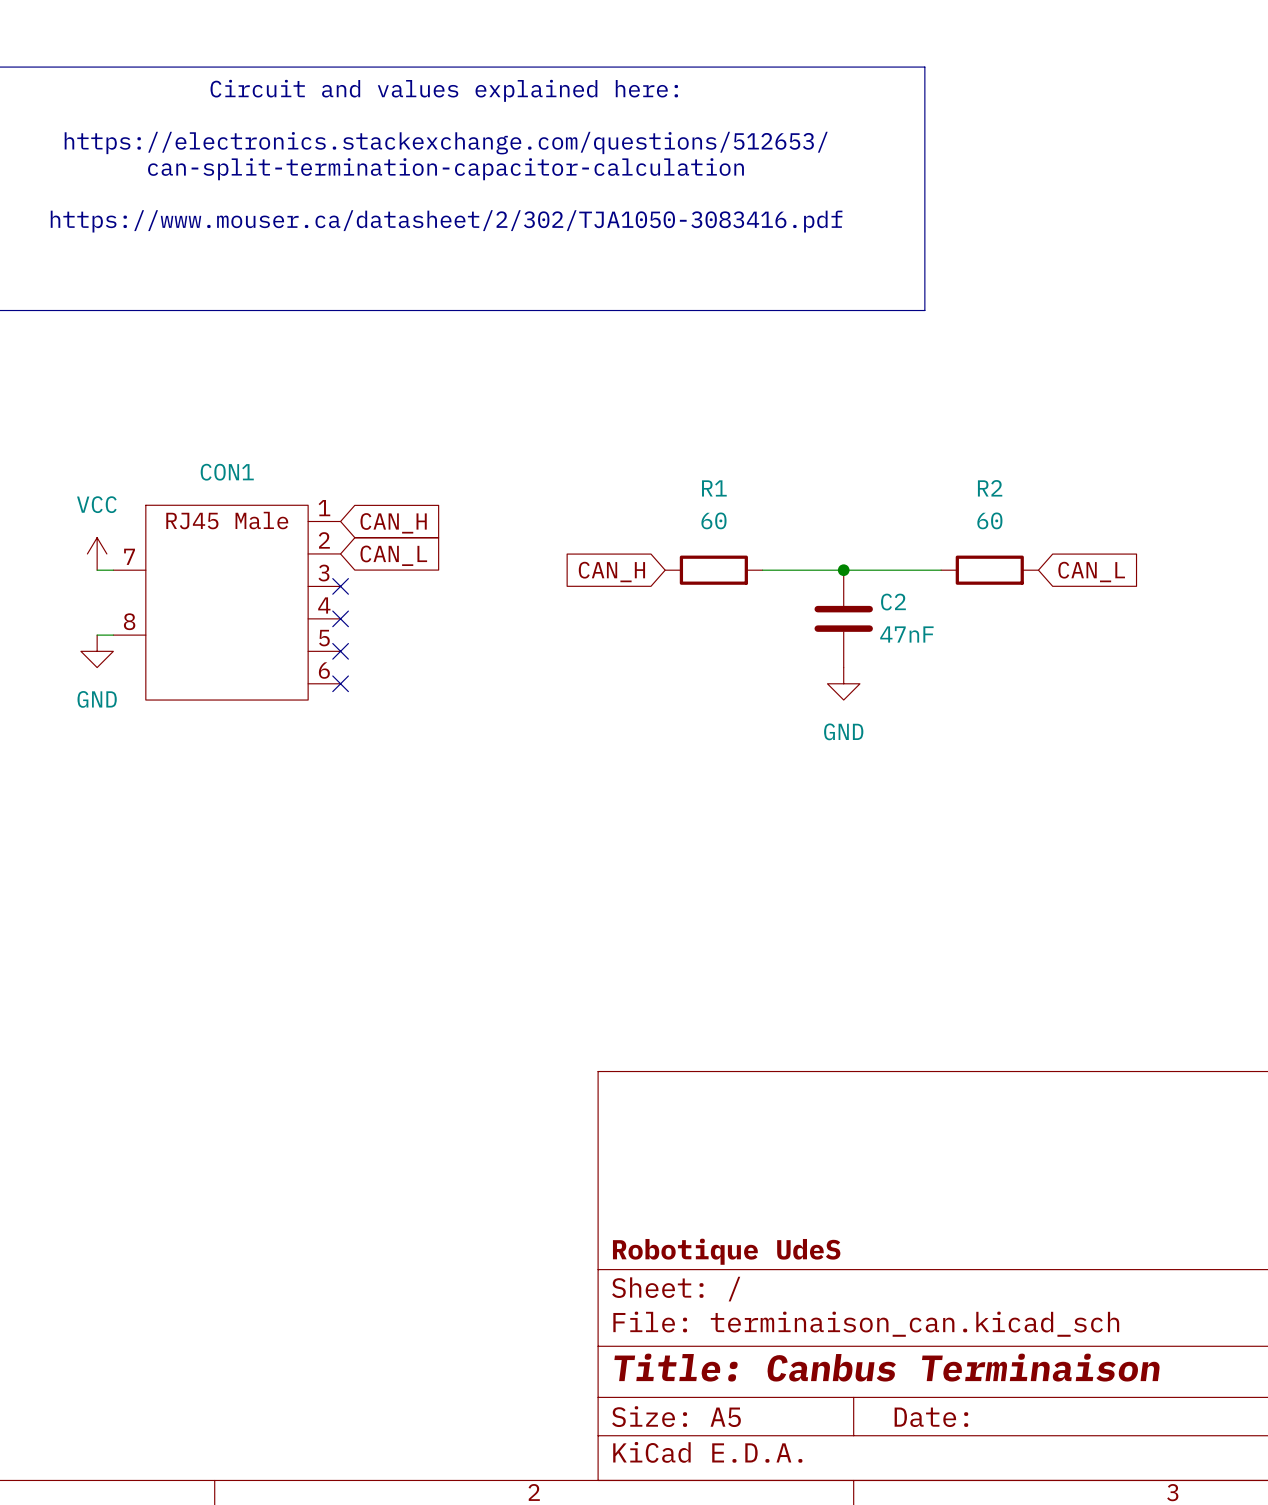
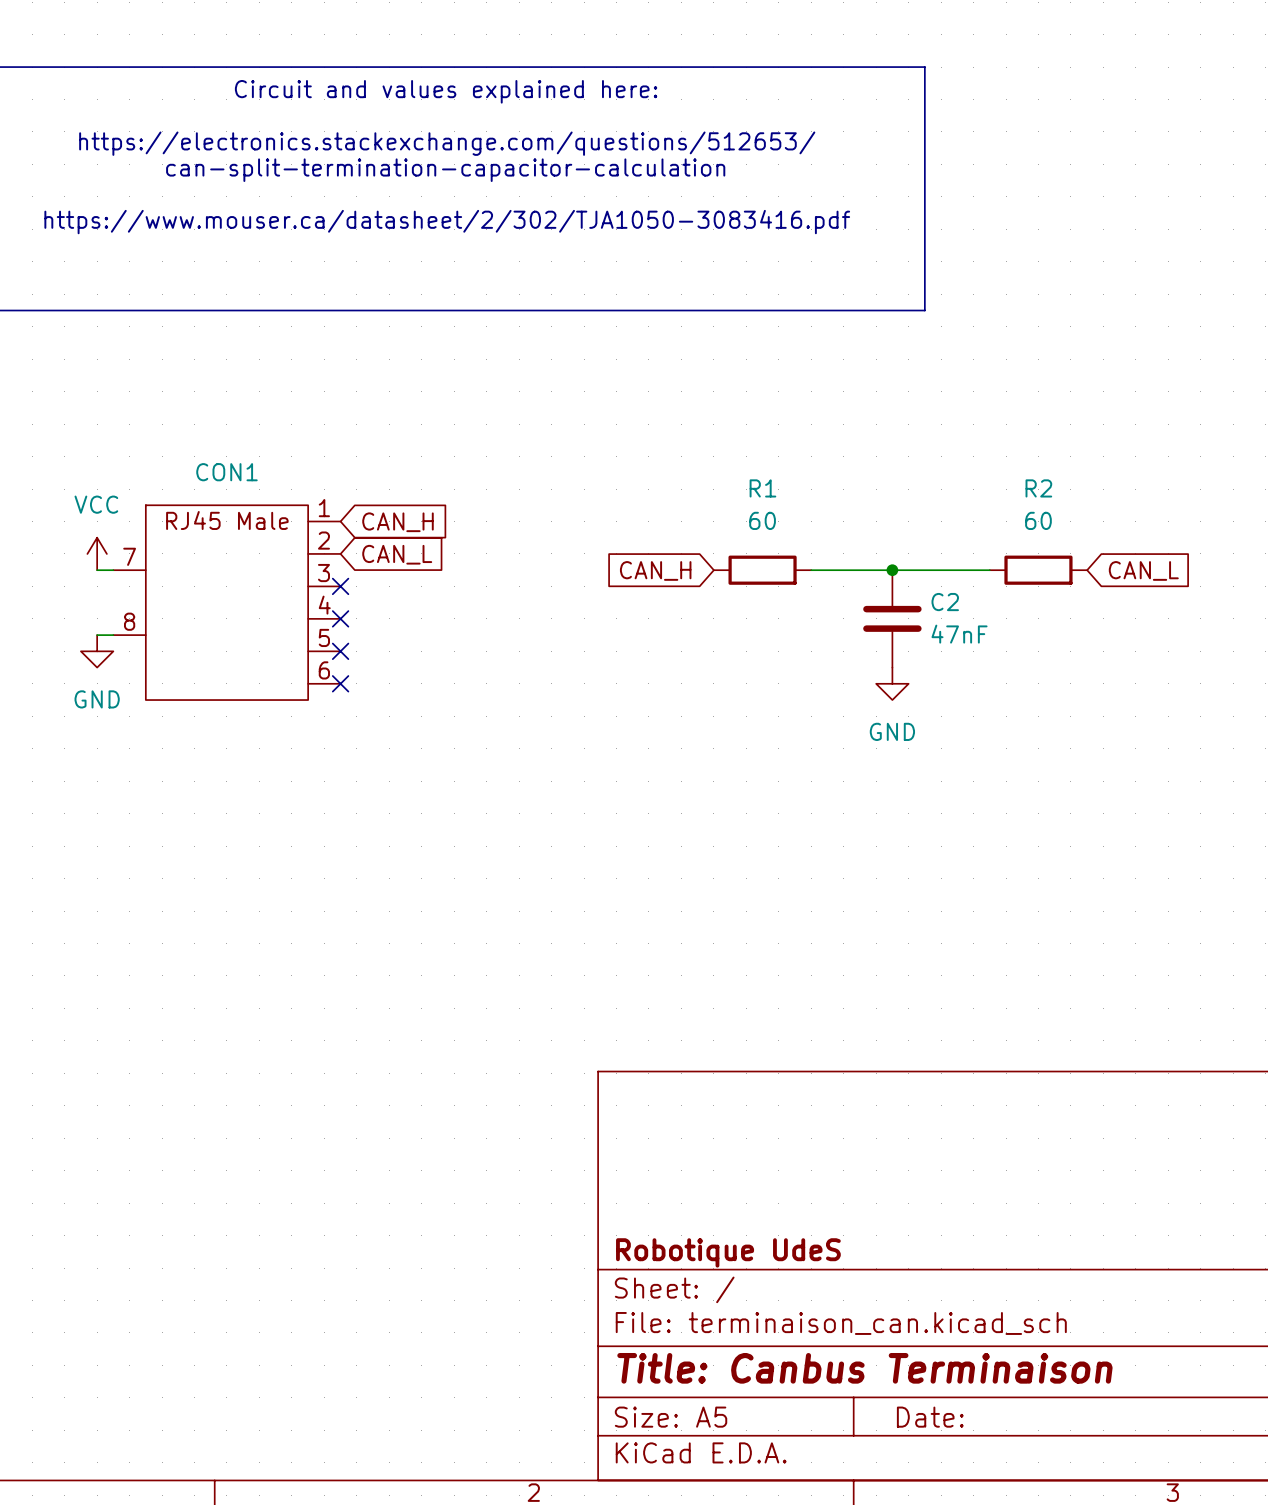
R1 position: (713, 570) -> (762, 570)
wire: (762, 570) (811, 570) -> (941, 570) (989, 570)
junction position: (843, 570) -> (892, 570)
R2 position: (989, 570) -> (1038, 570)
global label position: CAN_H (611, 572) -> CAN_H (655, 570)
global label position: CAN_L (1091, 572) -> CAN_L (1143, 570)
C2 position: (843, 618) -> (892, 618)
power symbol position: GND (843, 683) -> GND (892, 683)

